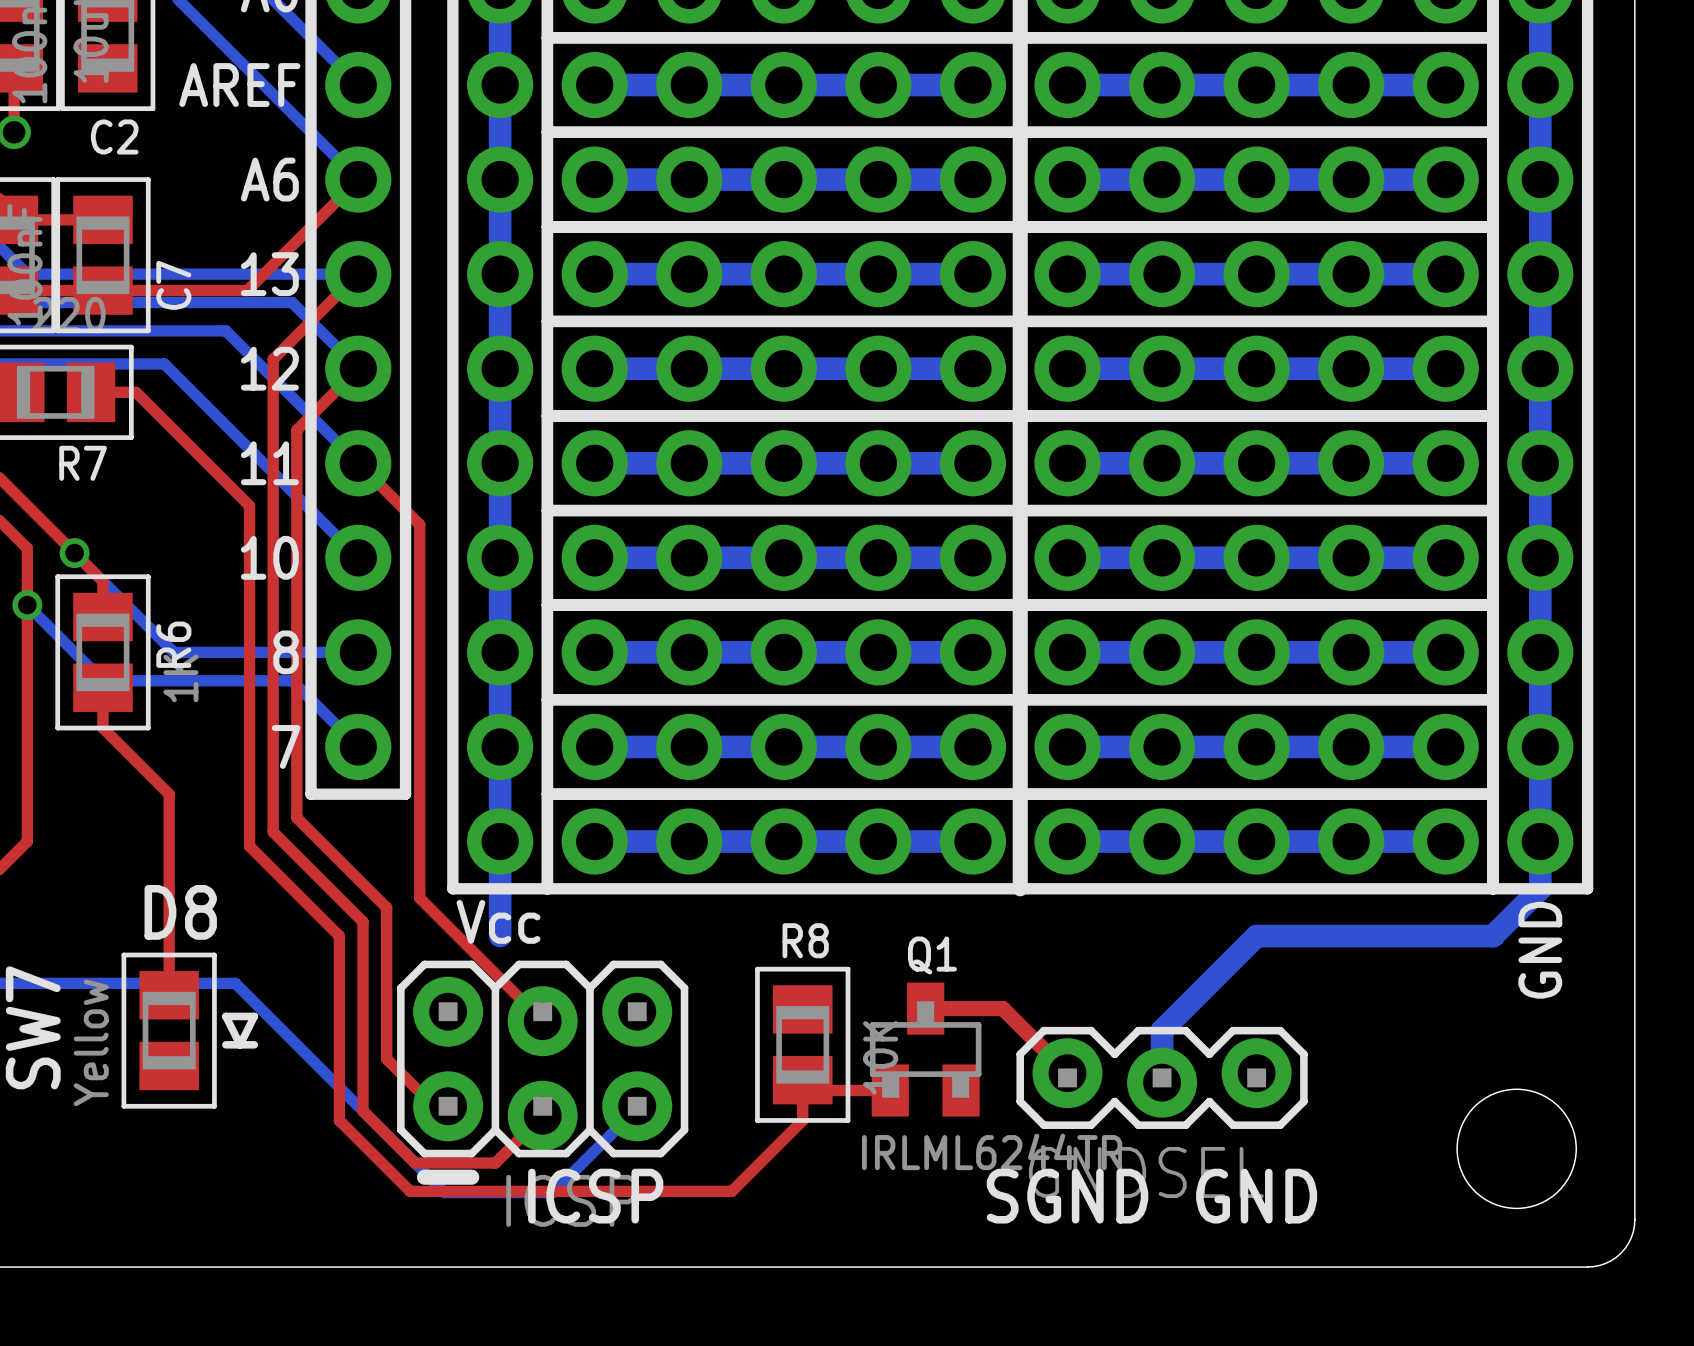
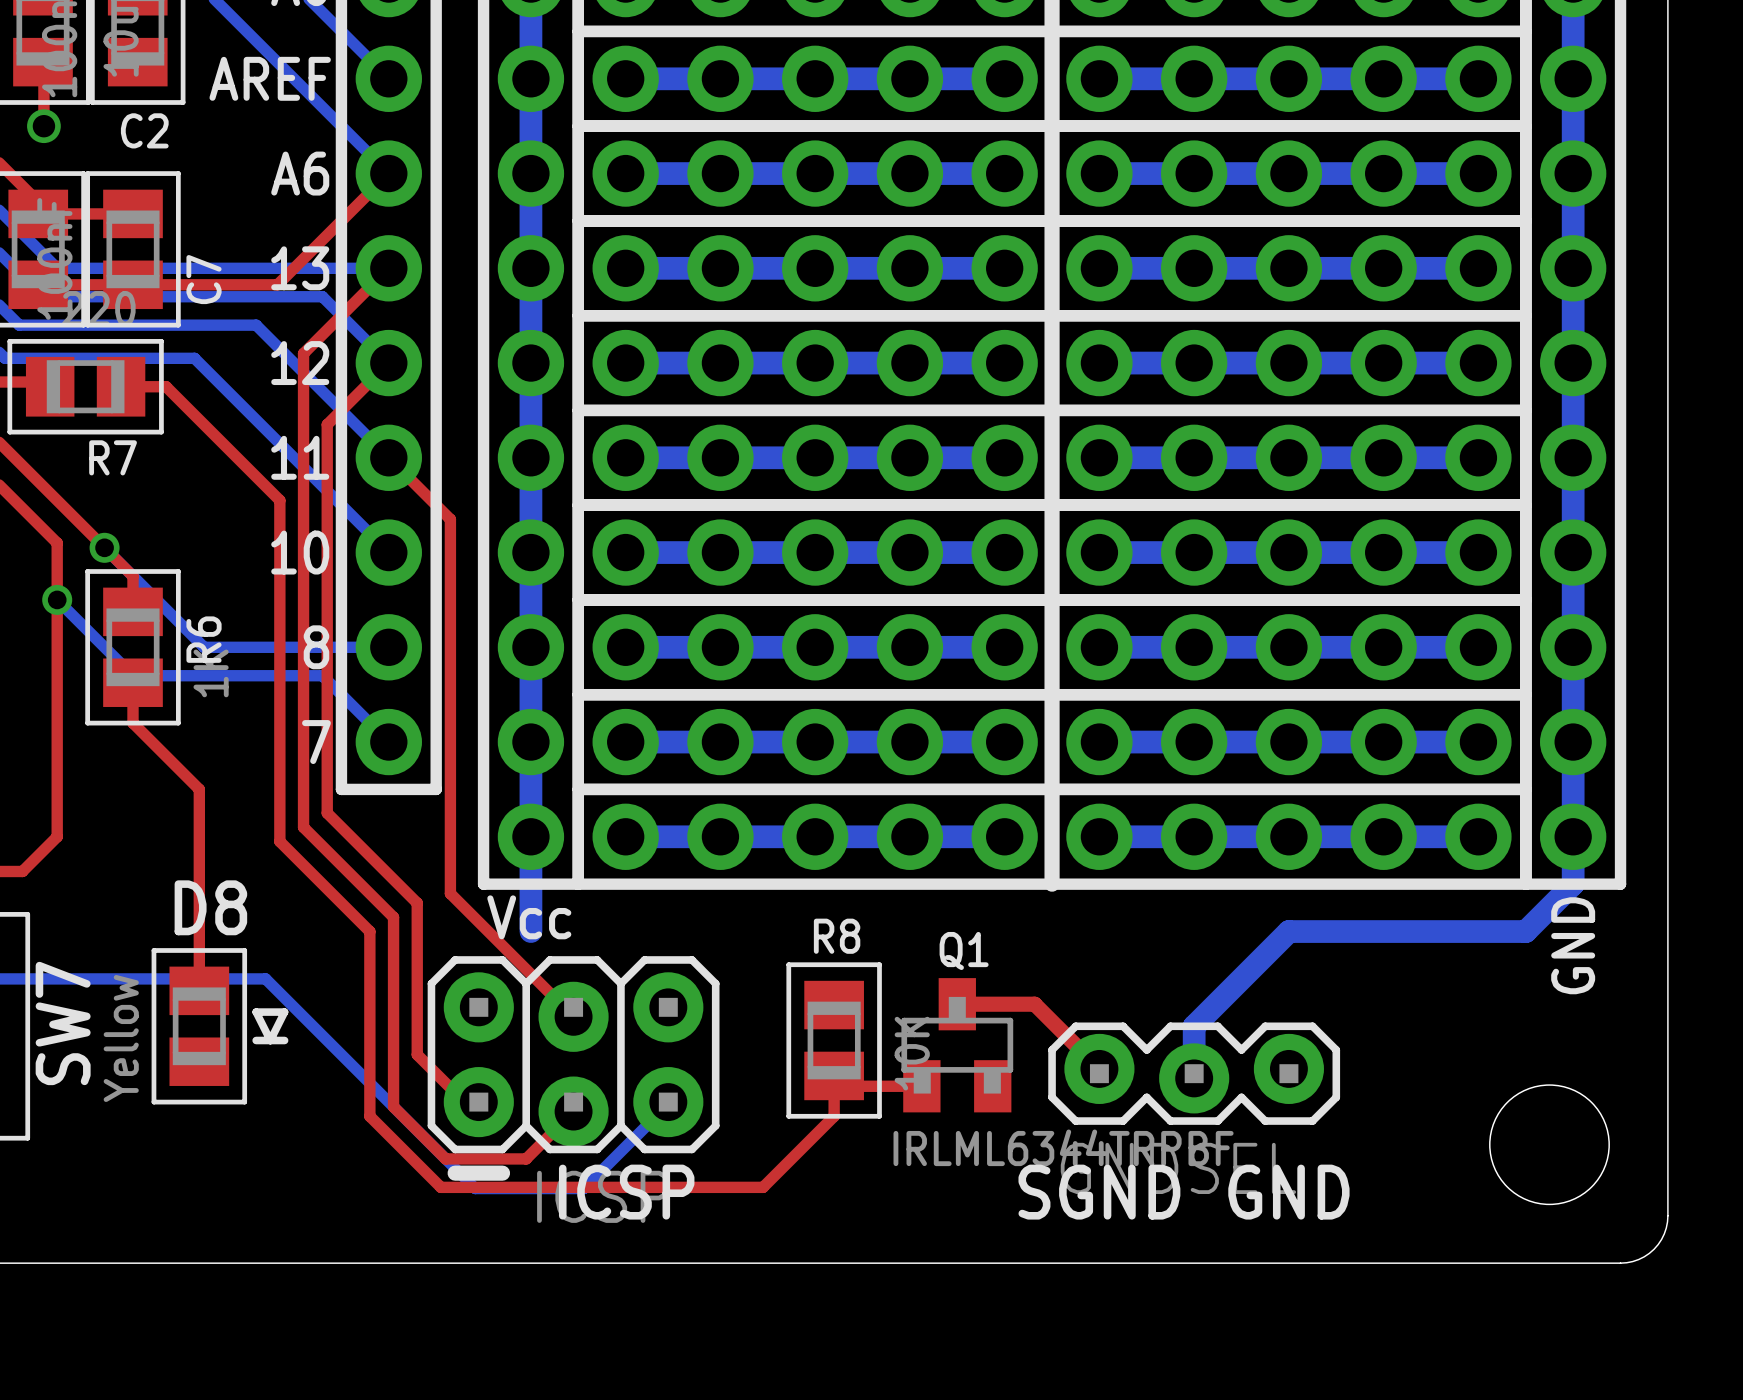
Q1 value: IRLML6244TR (992, 1151) -> IRLML6344TRPBF (1063, 1147)

